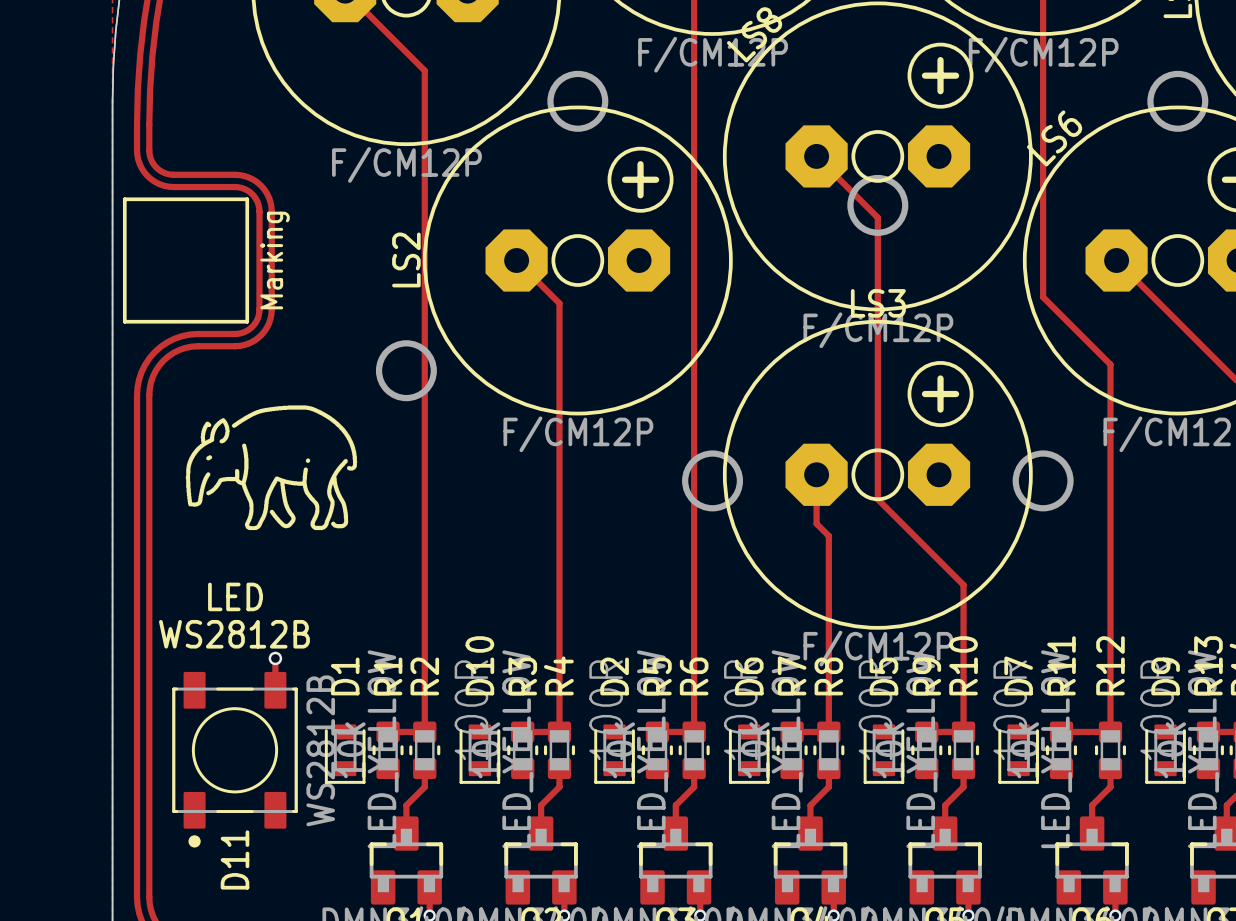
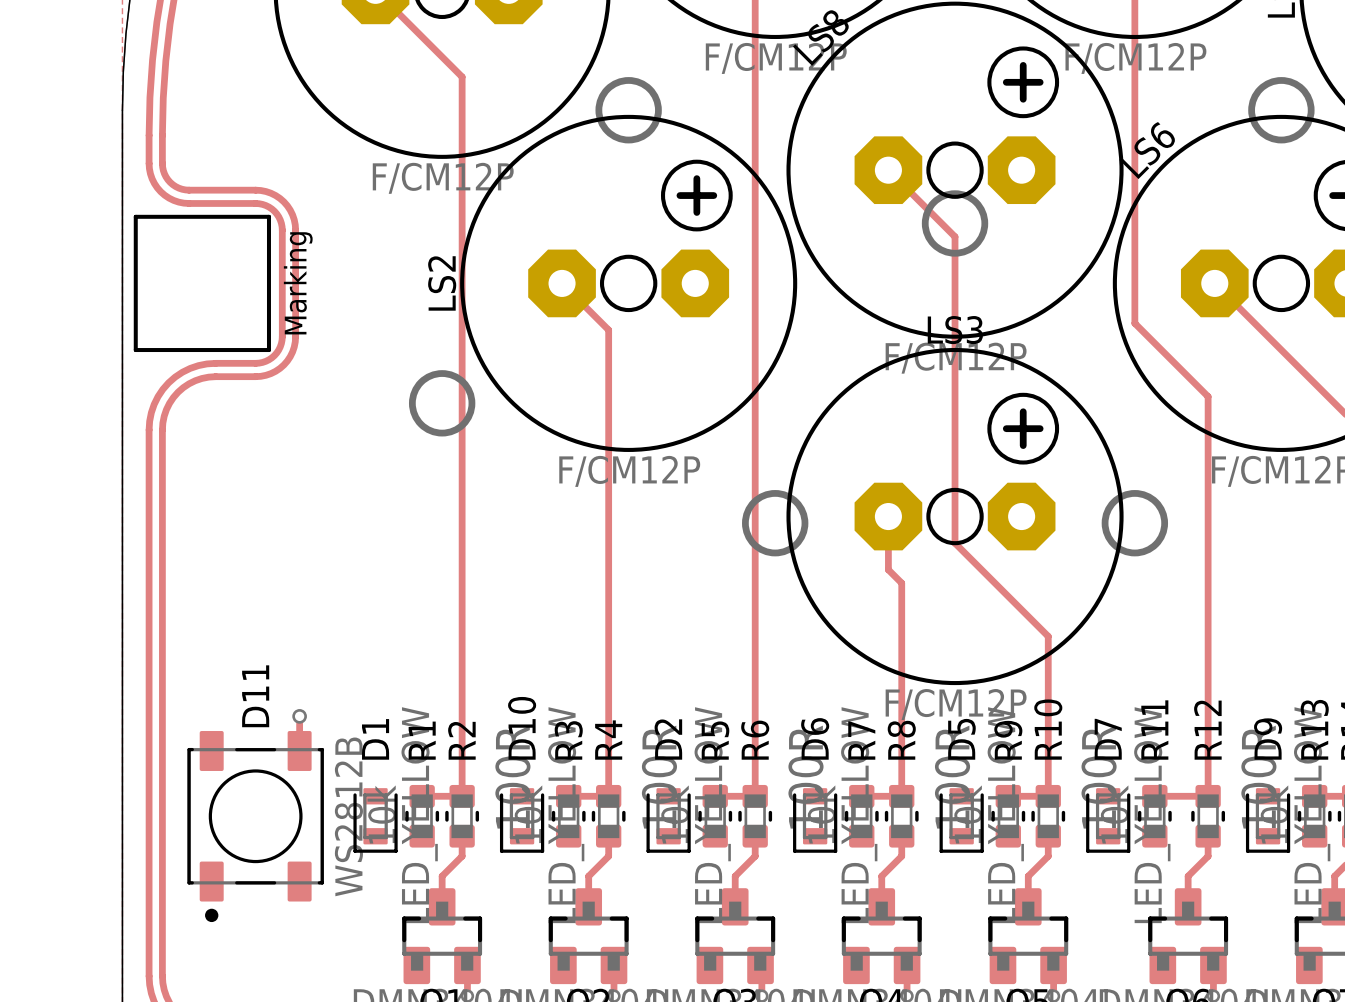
drawing: [185, 405, 358, 531] -> none
text: LED (235, 596) -> none
text: WS2812B (234, 634) -> none
D11 name position: D11 (234, 859) -> D11 (255, 696)

